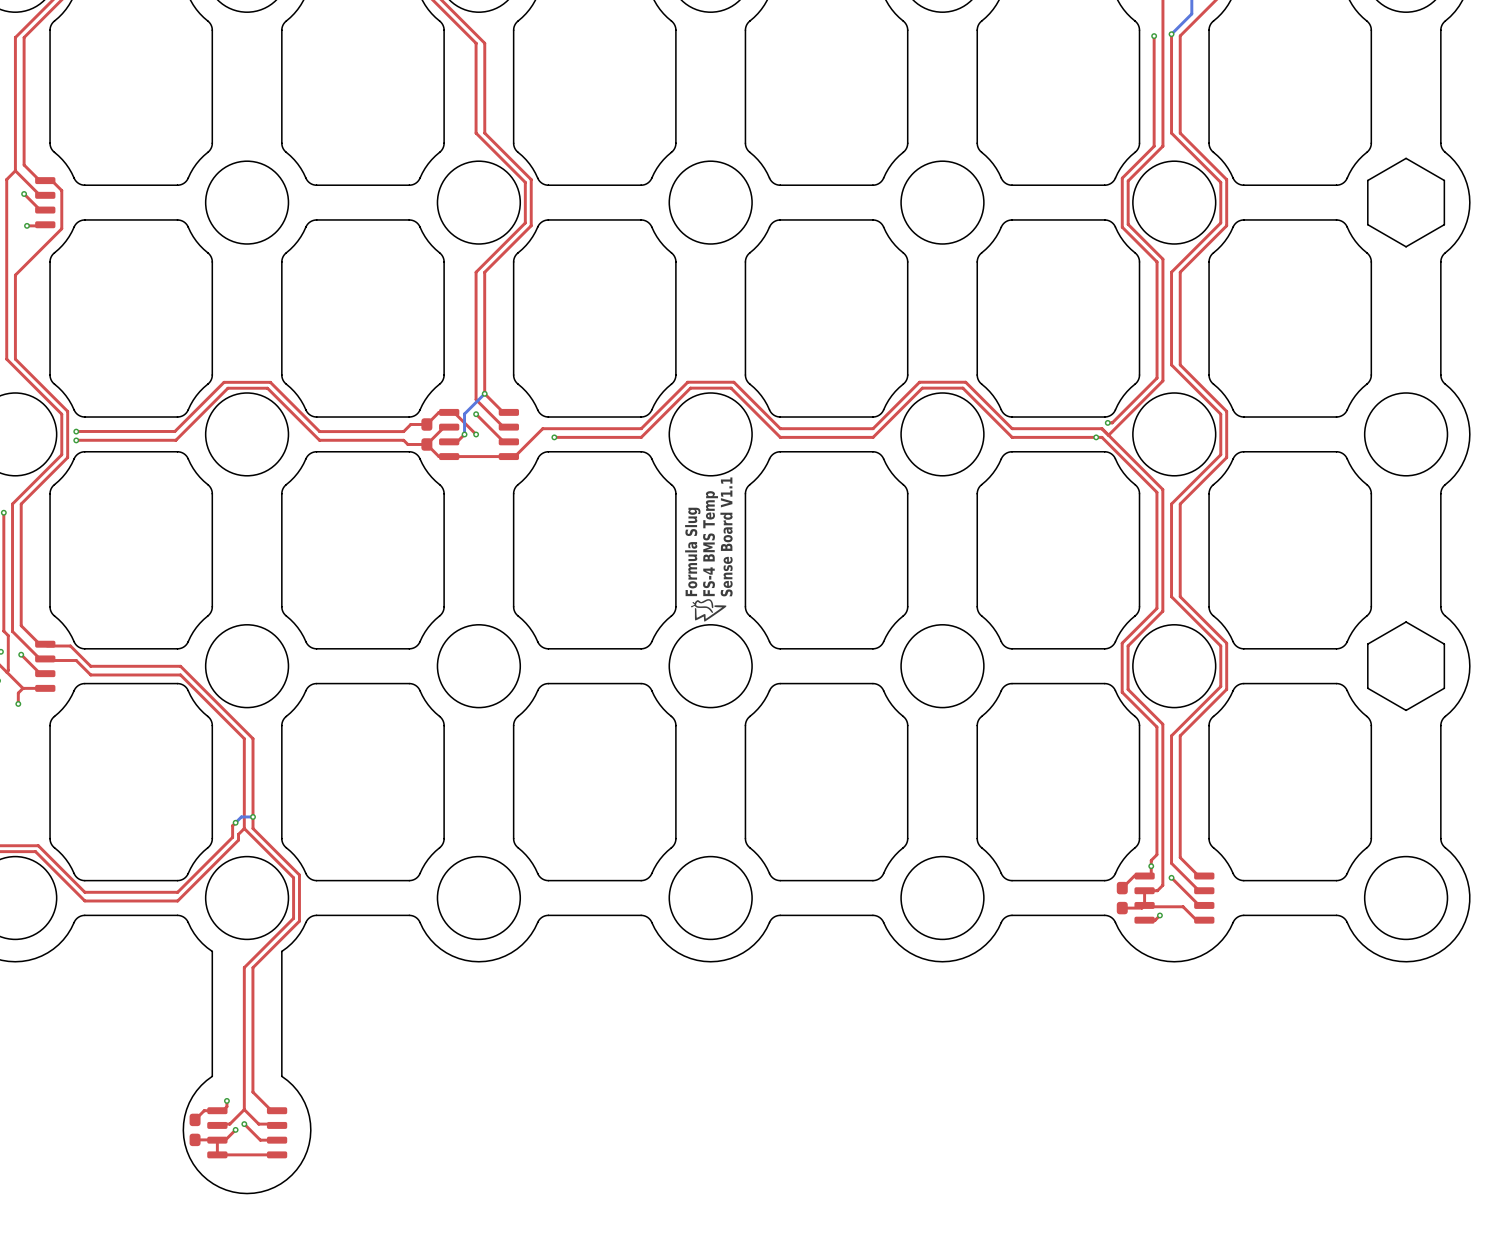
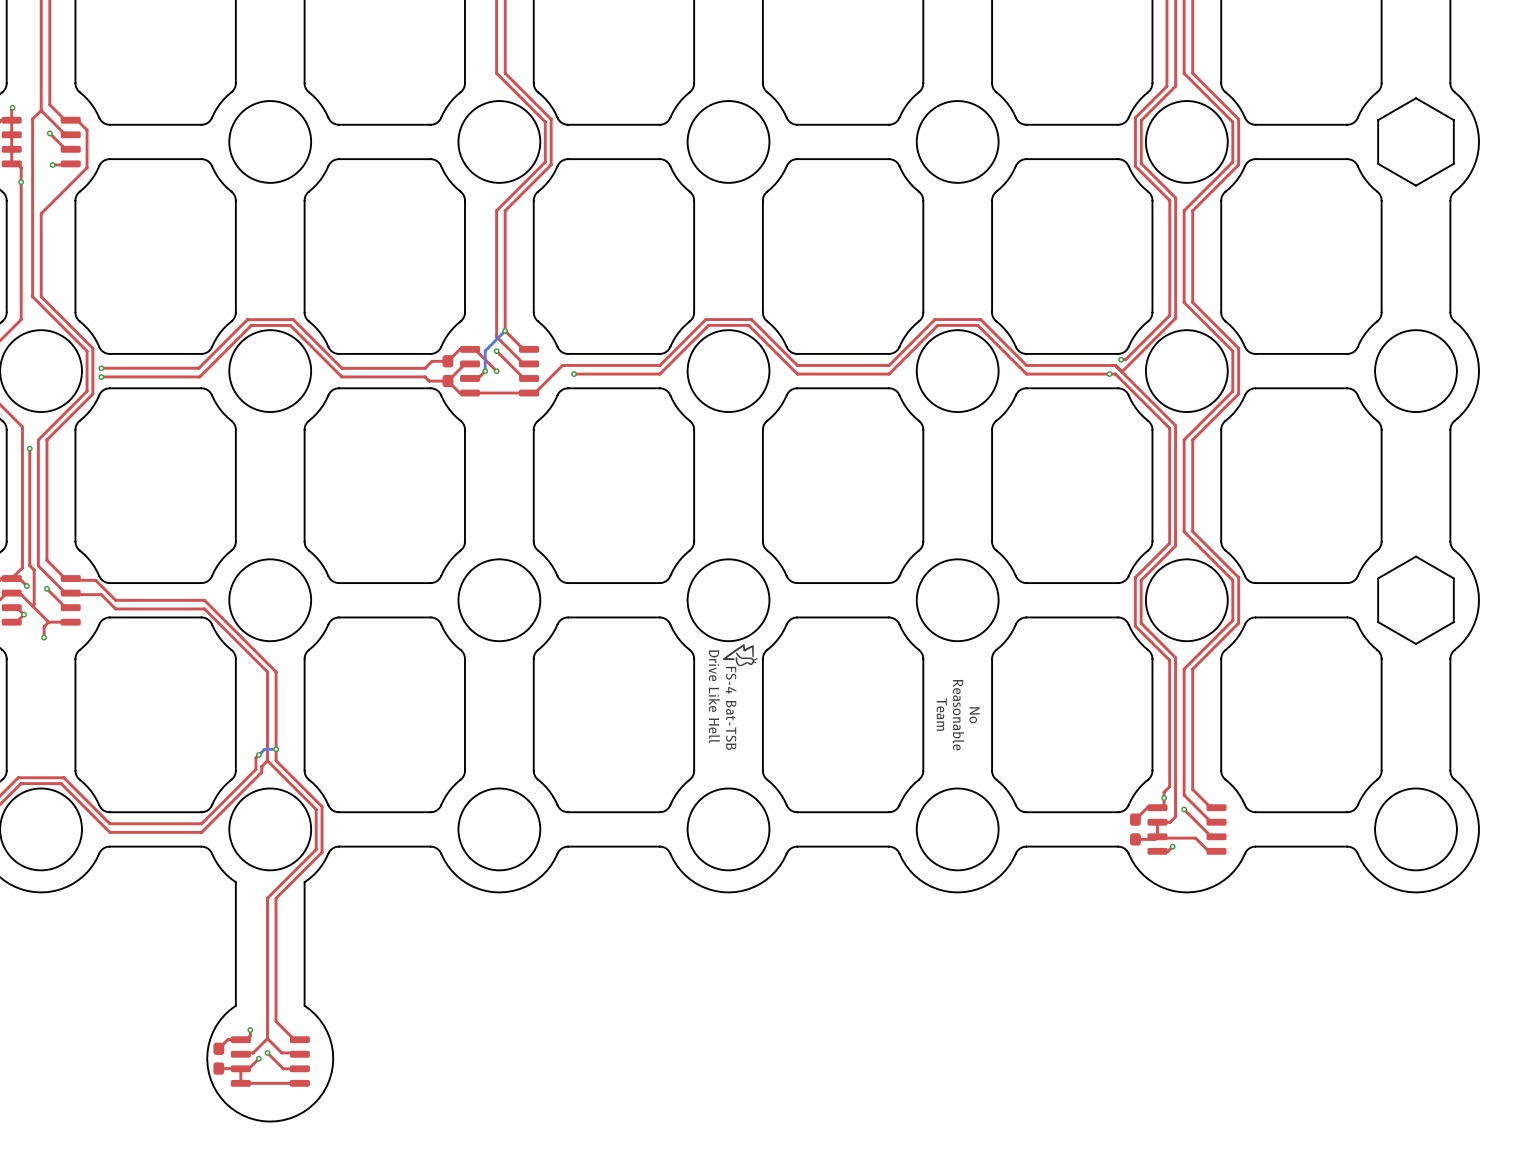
drawing: [691, 599, 727, 622] -> none
drawing: none -> [722, 643, 758, 667]
text: none -> Team (941, 714)
text: none -> Reasonable (958, 715)
text: none -> No (974, 715)

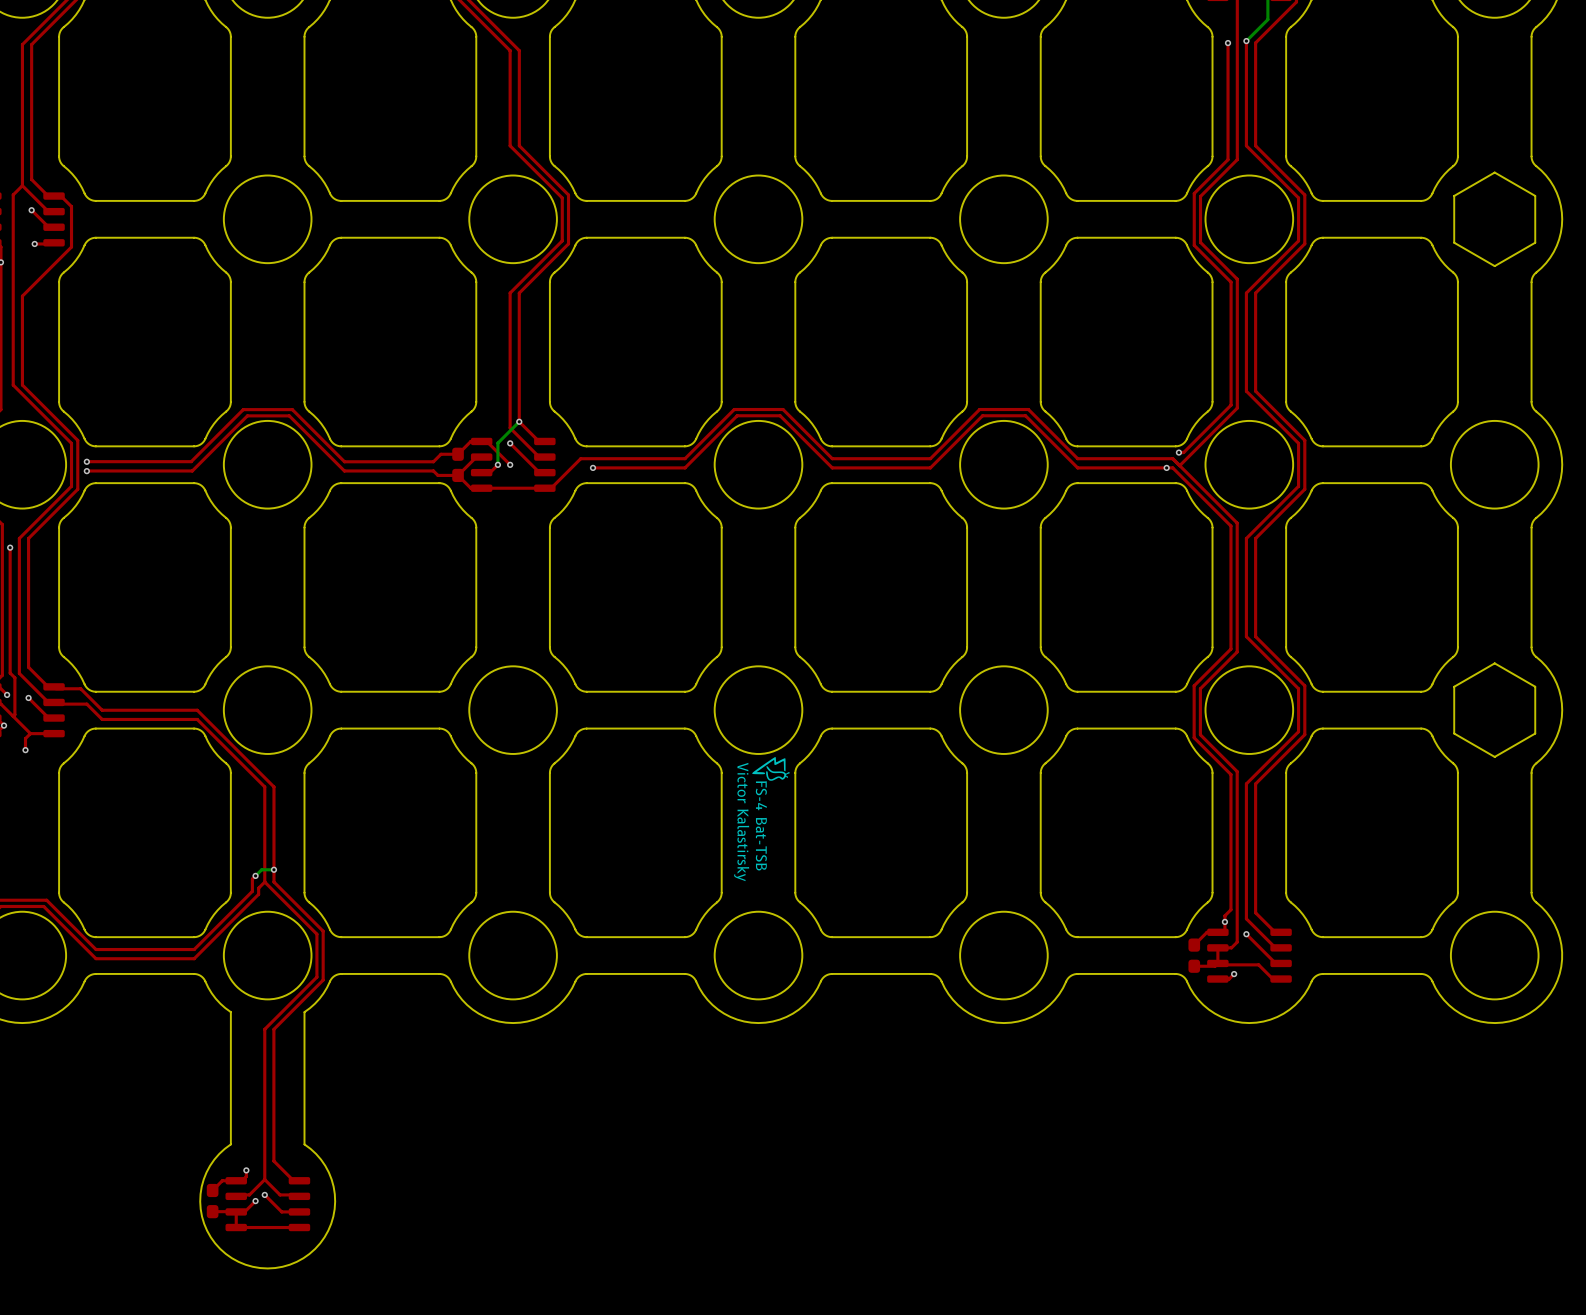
drawing shape: [708, 643, 758, 750] -> [734, 756, 790, 882]
text: Team (941, 714) -> none
text: Reasonable (958, 715) -> none
text: No (974, 715) -> none

